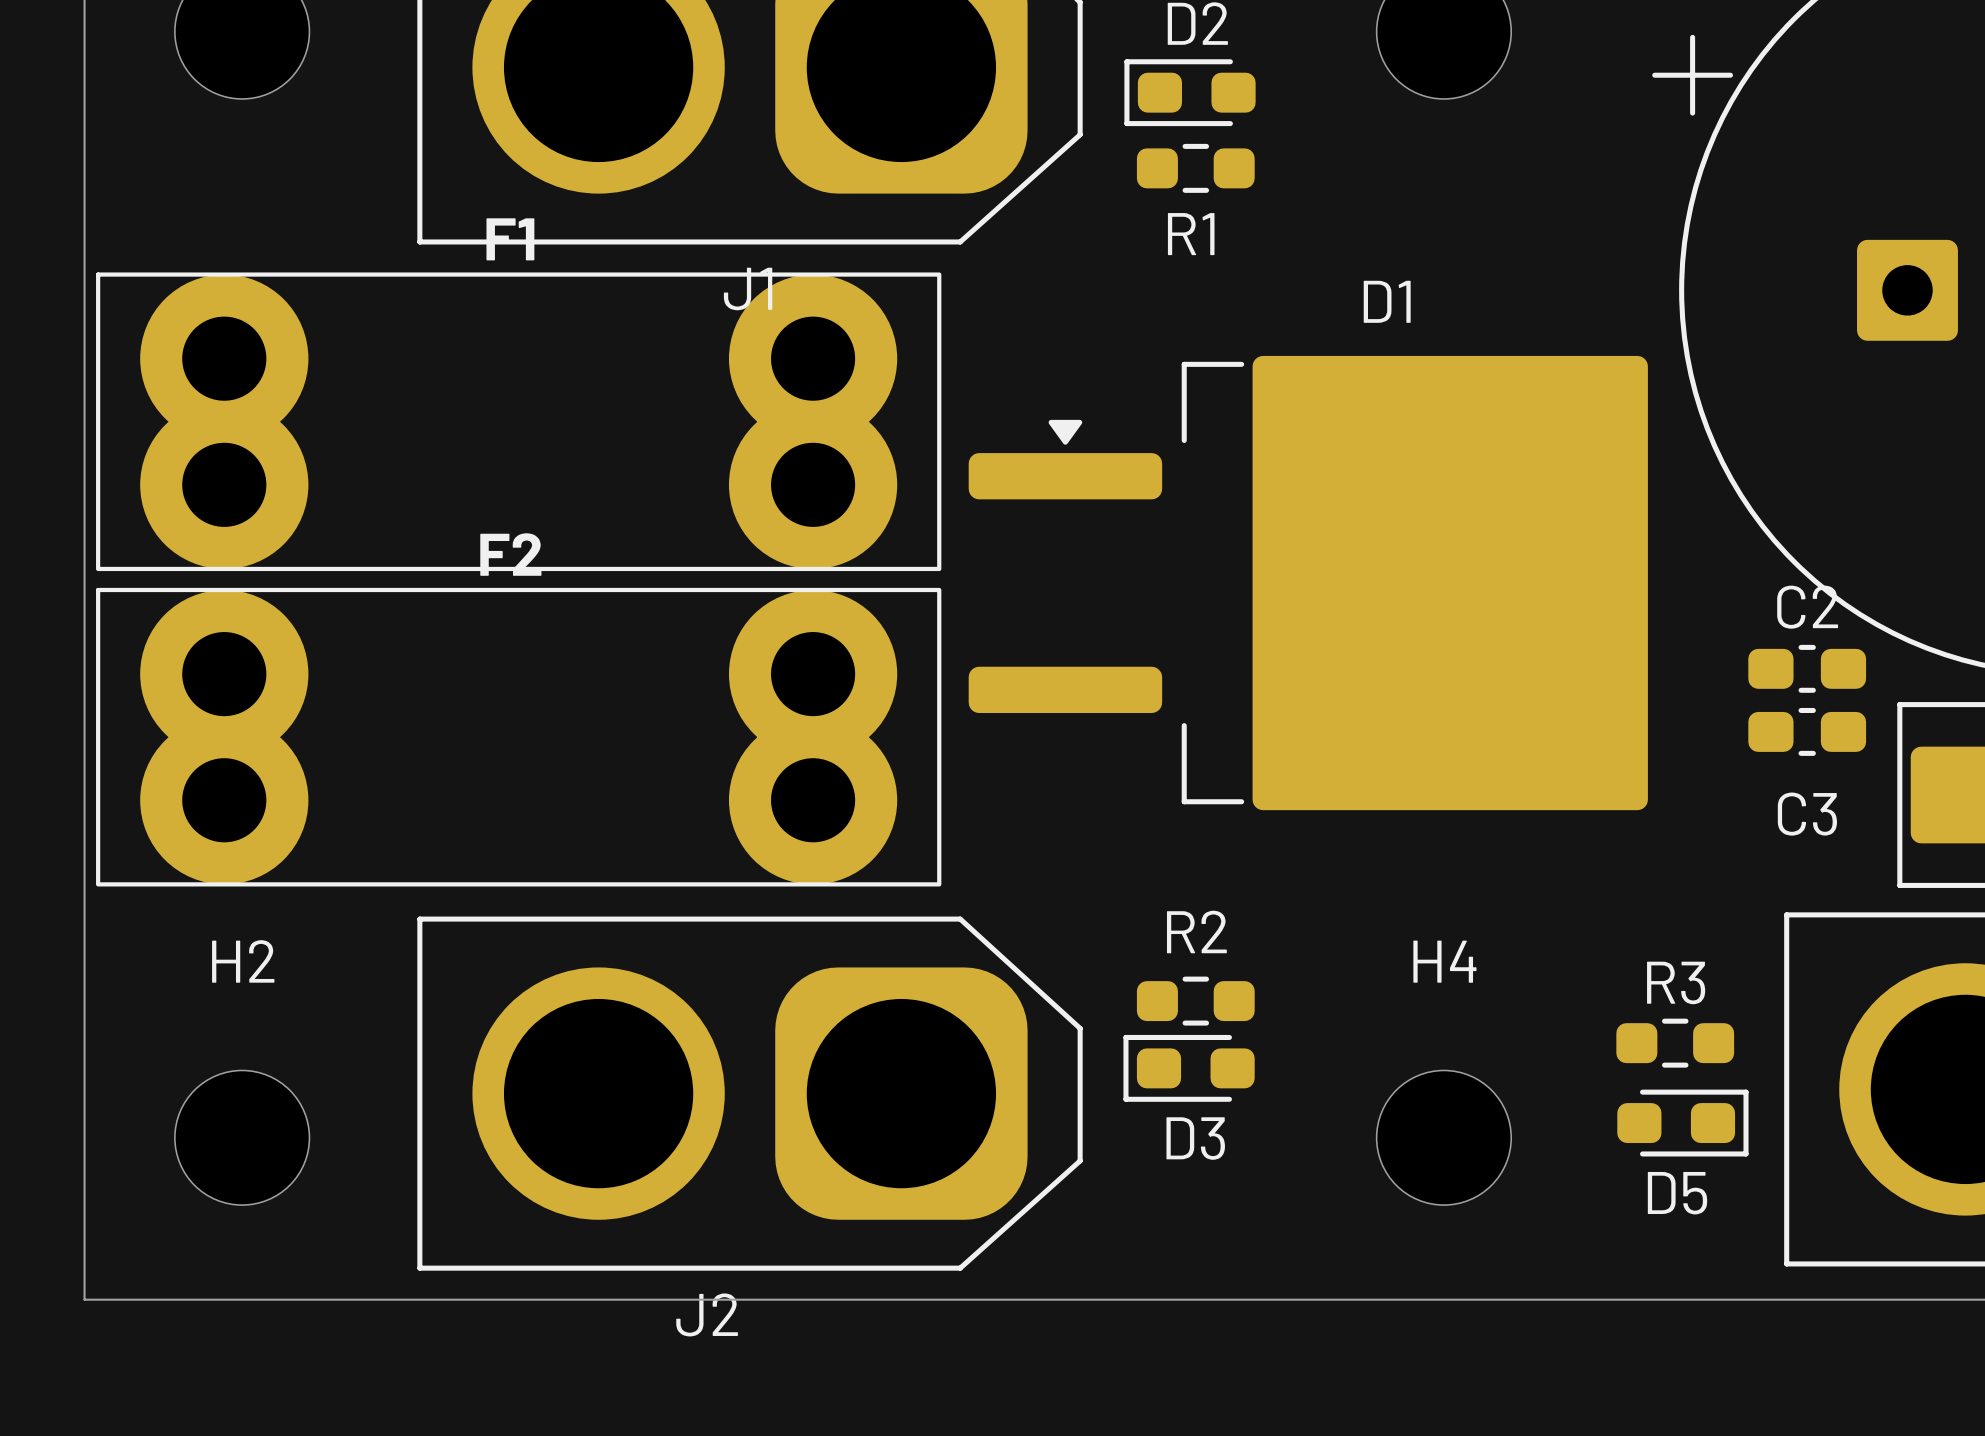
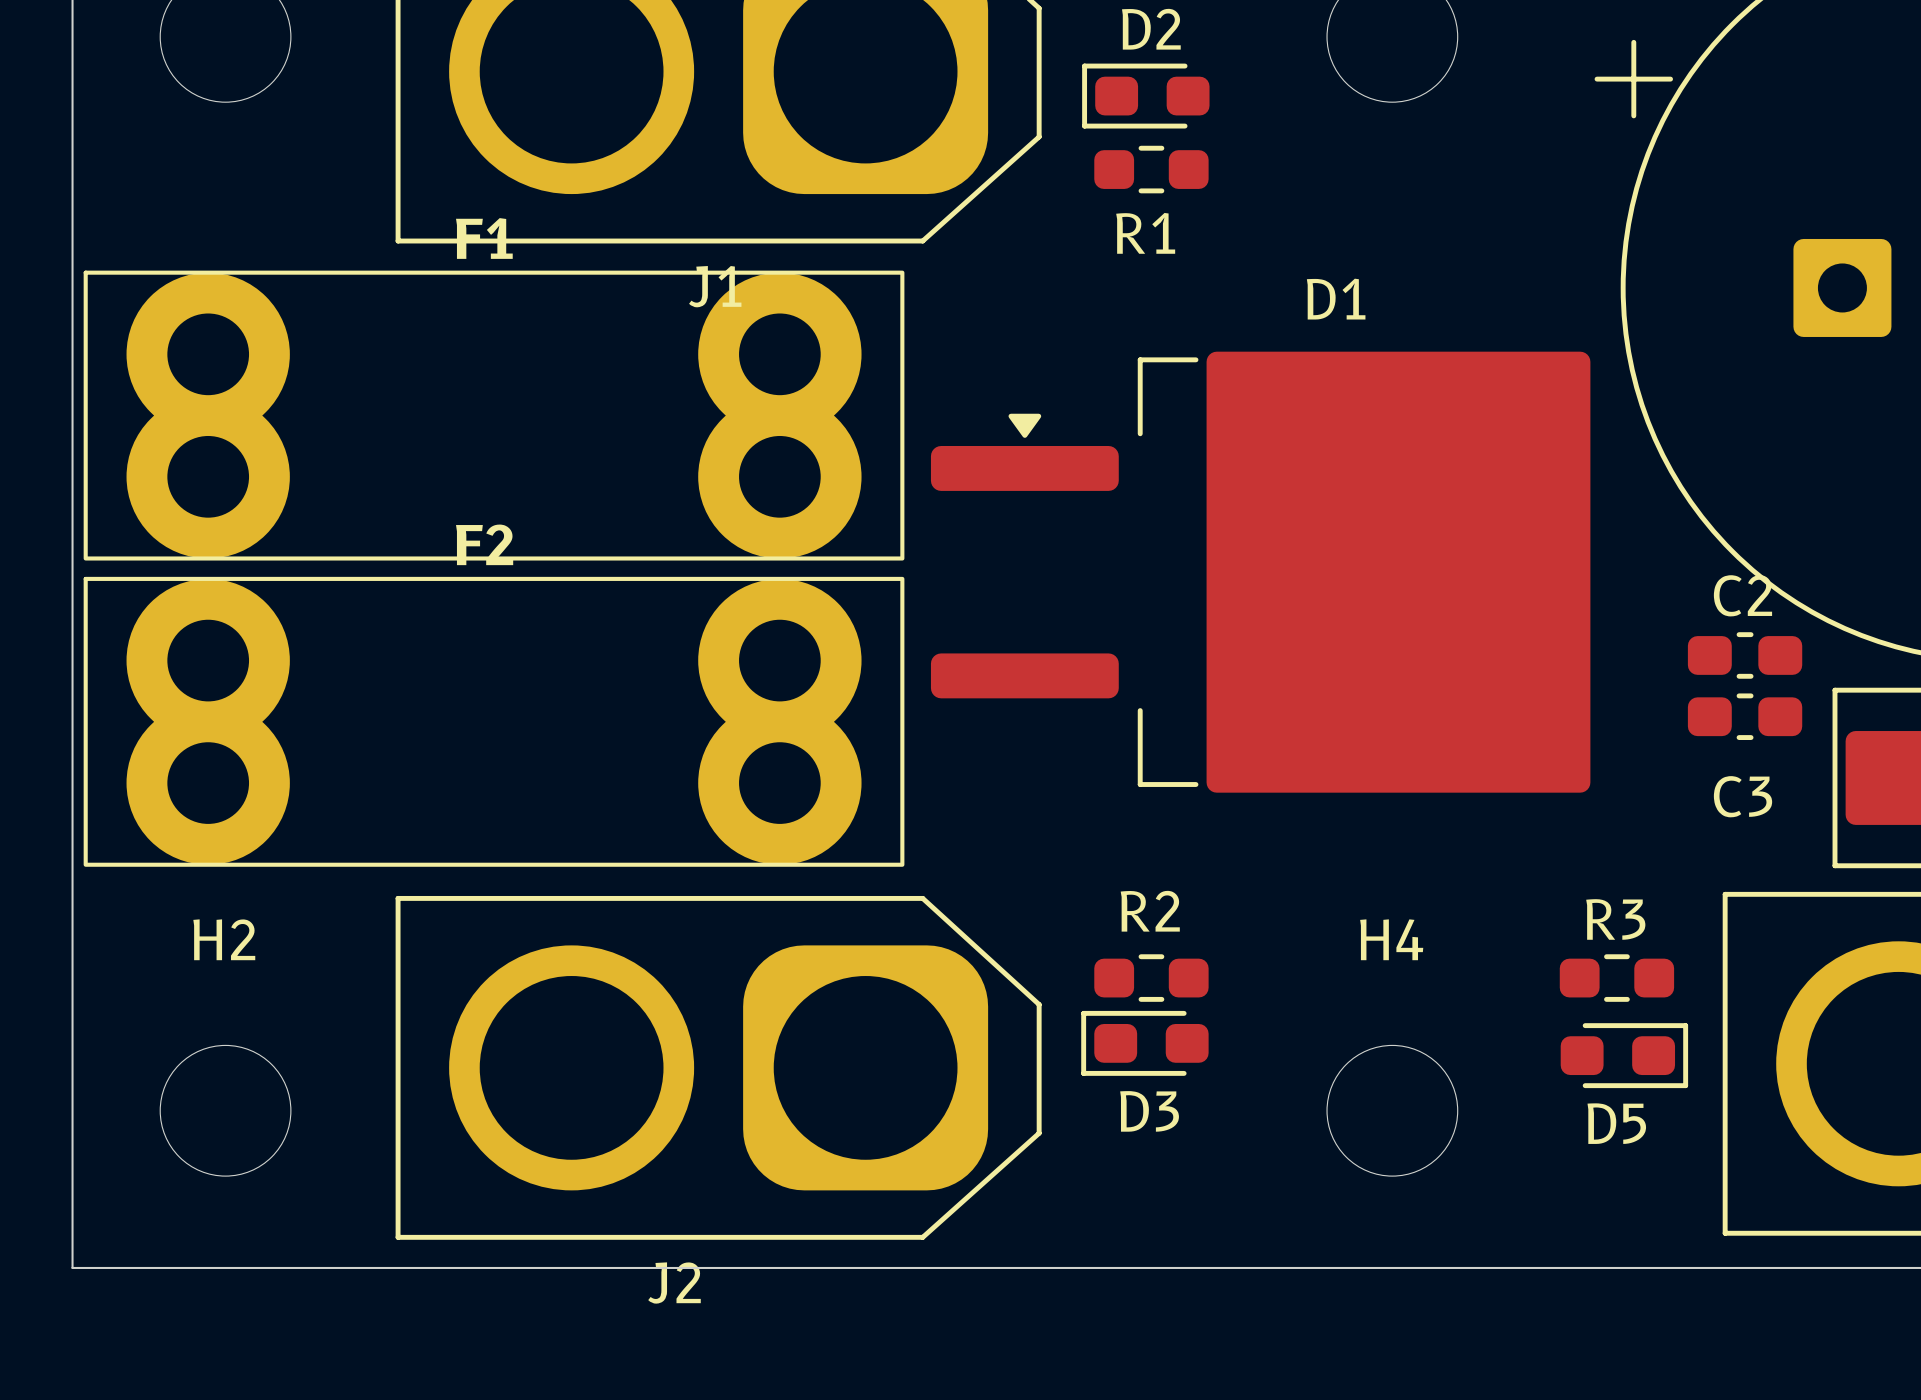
R3 position: (1675, 1043) -> (1616, 978)
D5 position: (1682, 1123) -> (1624, 1055)

